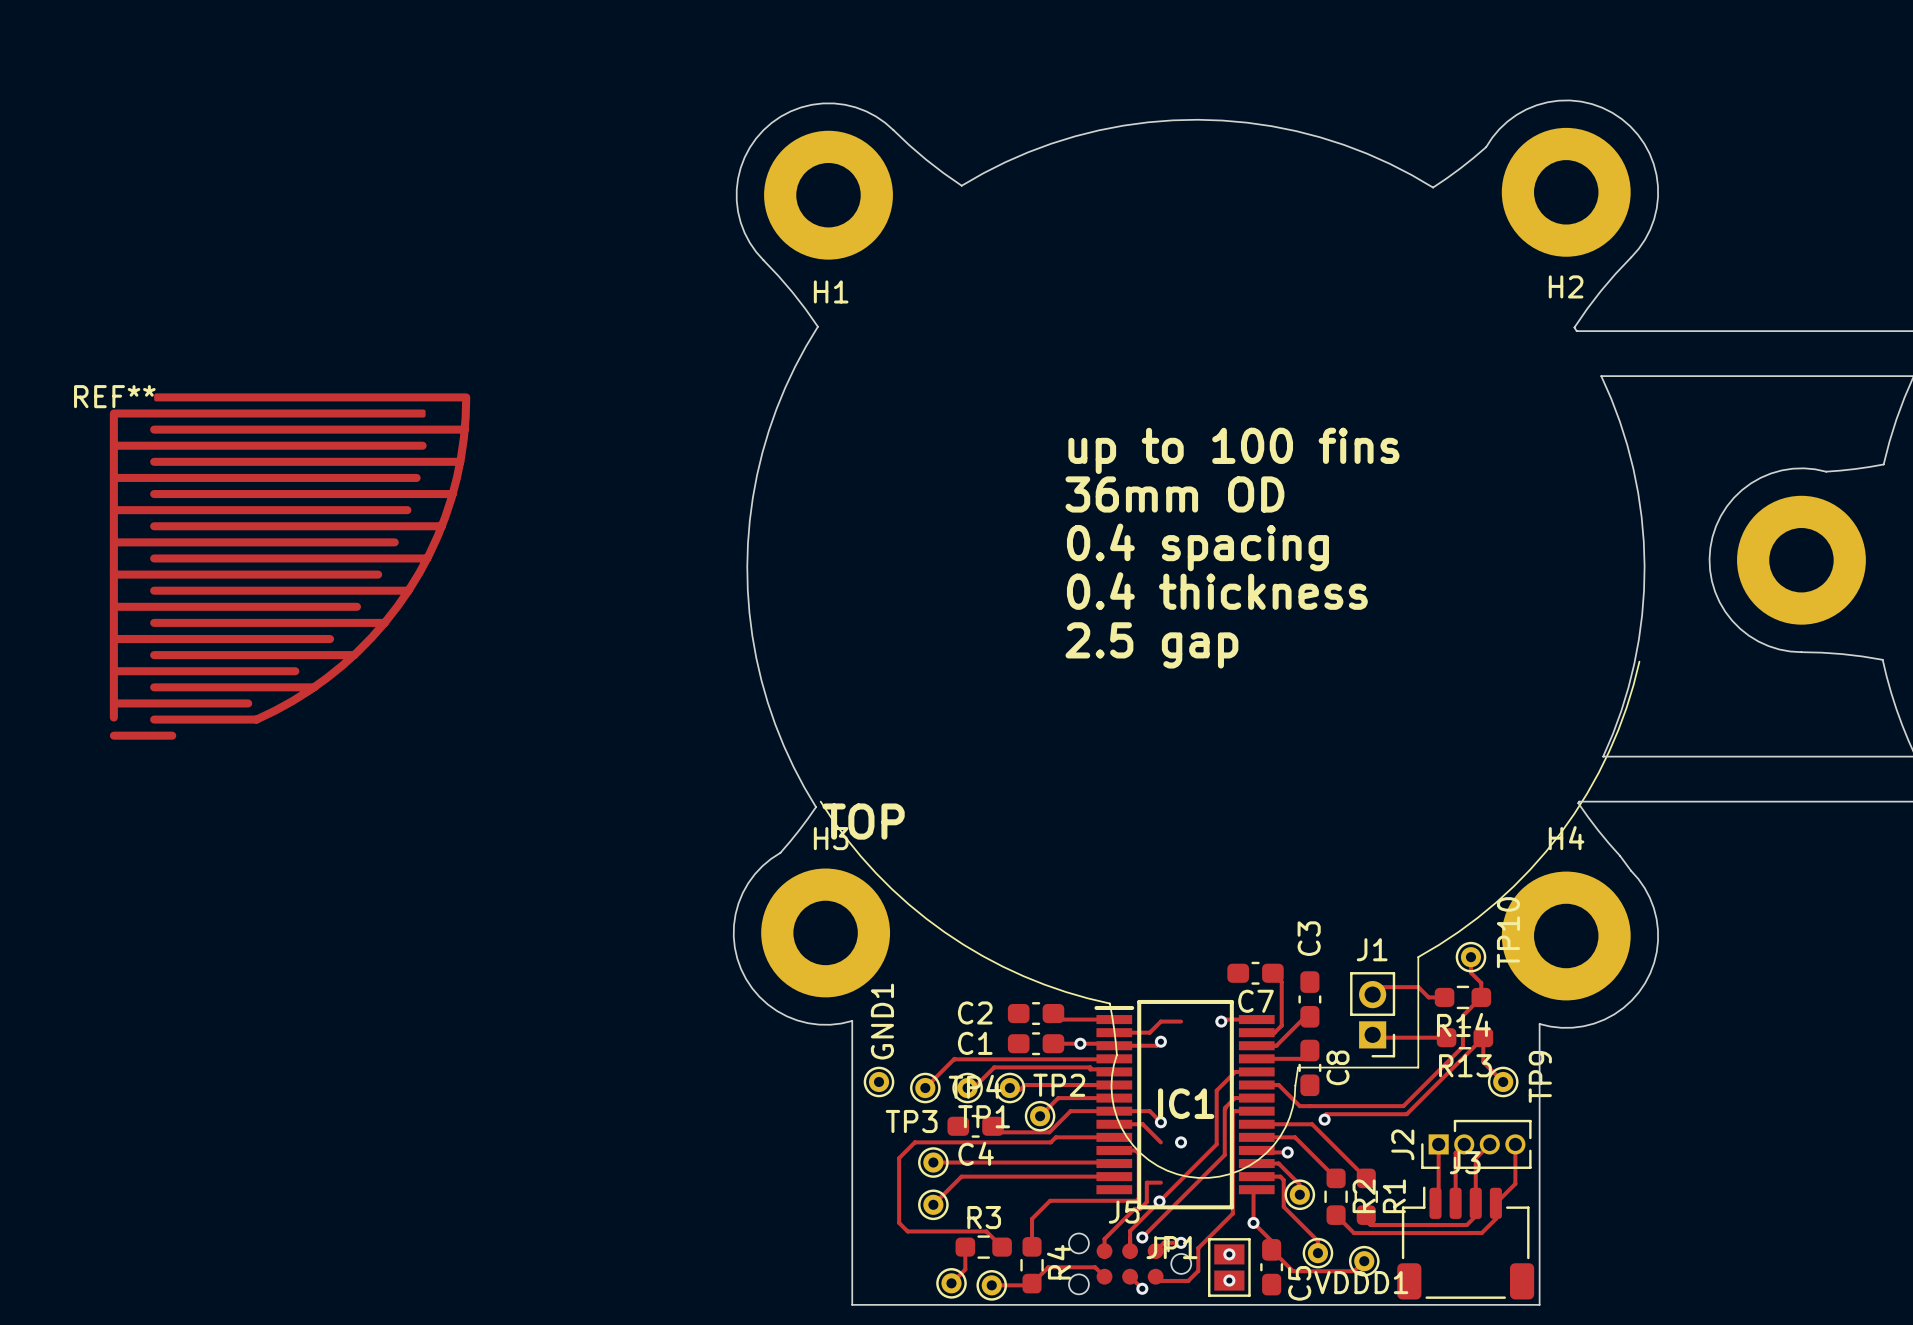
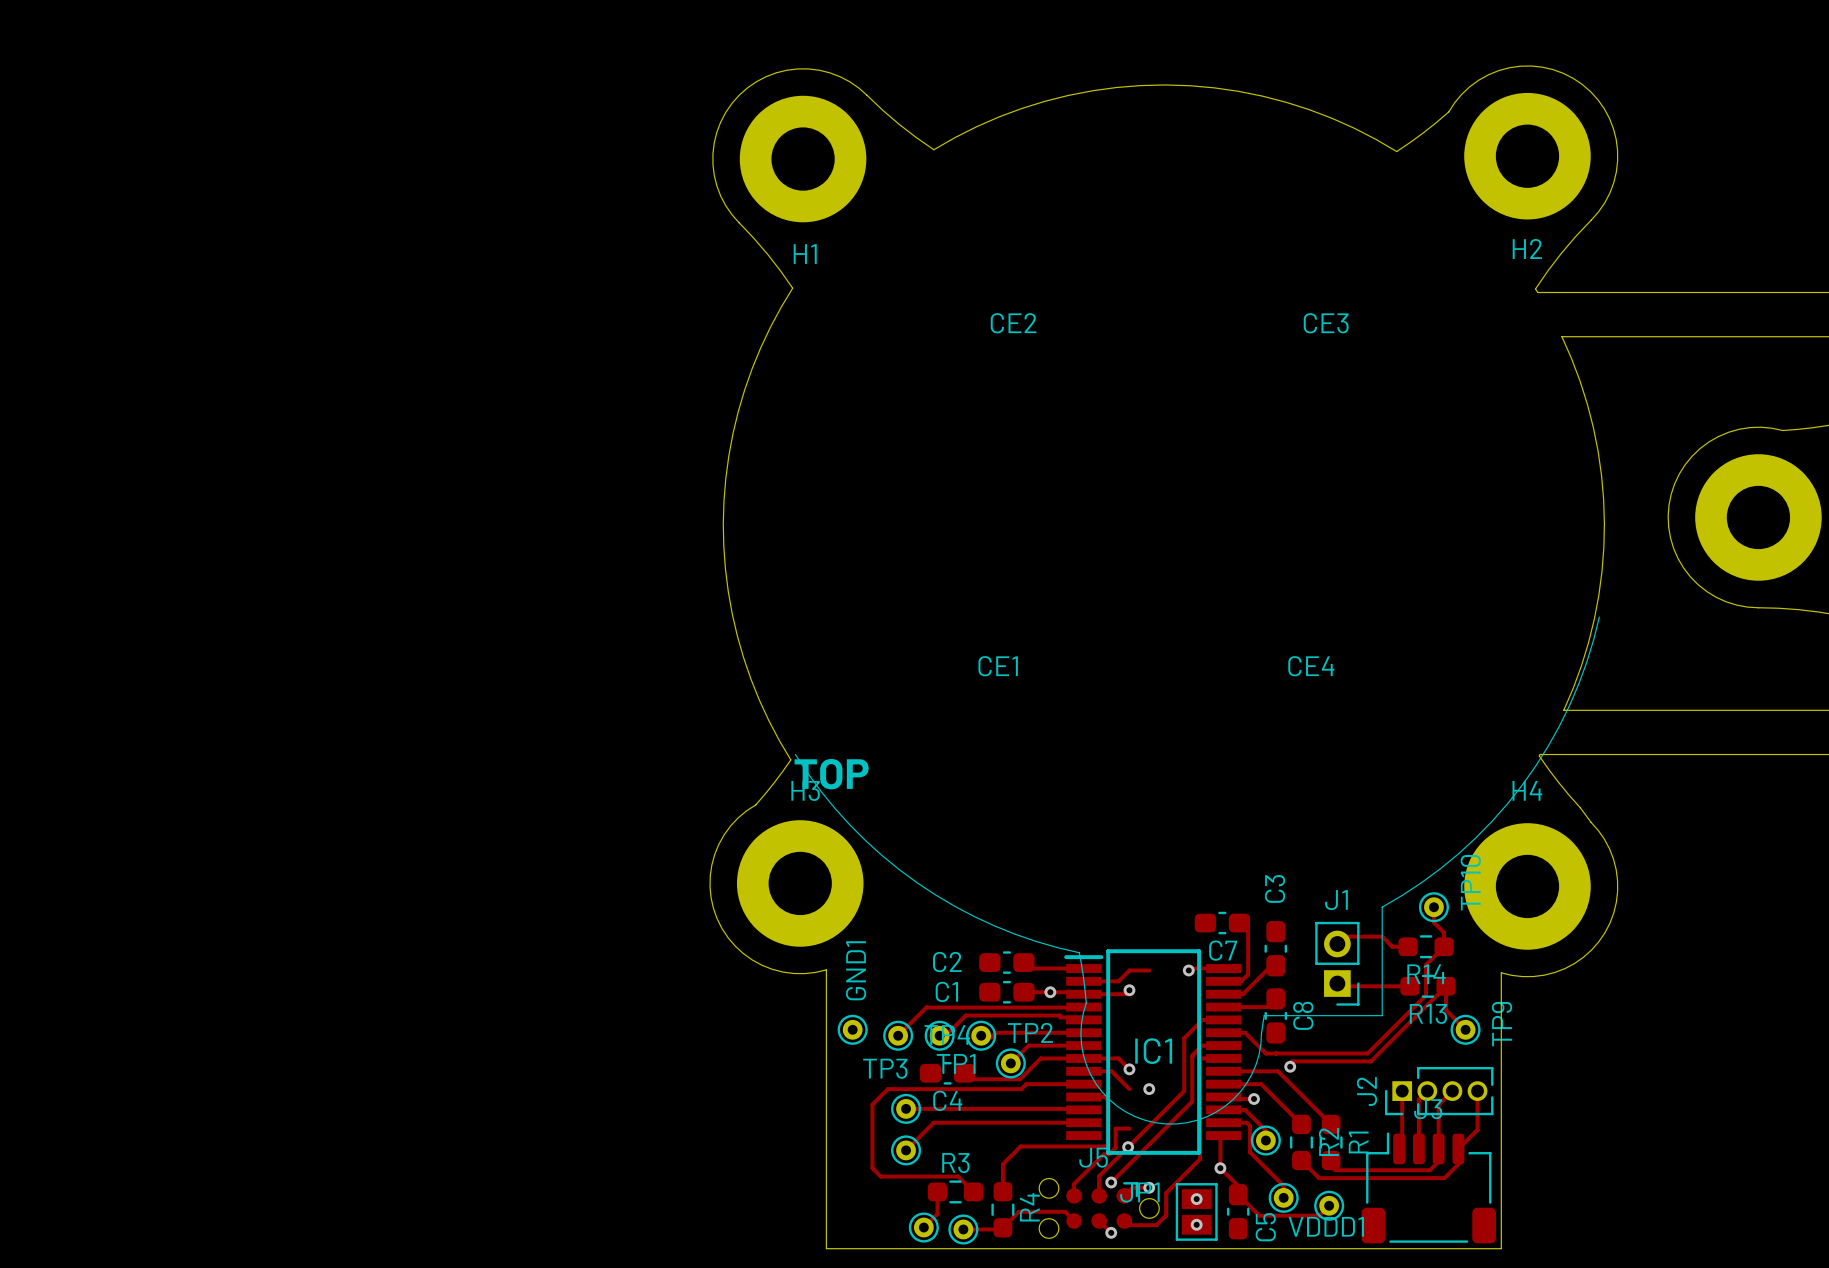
CE2: none -> (1013, 323)
CE3: none -> (1326, 323)
text: up to 100 fins (1233, 450) -> none
text: 36mm OD (1174, 494) -> none
text: 0.4 spacing (1197, 547) -> none
REF**: (290, 566) -> none
text: 0.4 thickness (1217, 591) -> none
text: 2.5 gap (1151, 645) -> none
CE1: none -> (998, 666)
CE4: none -> (1311, 666)

